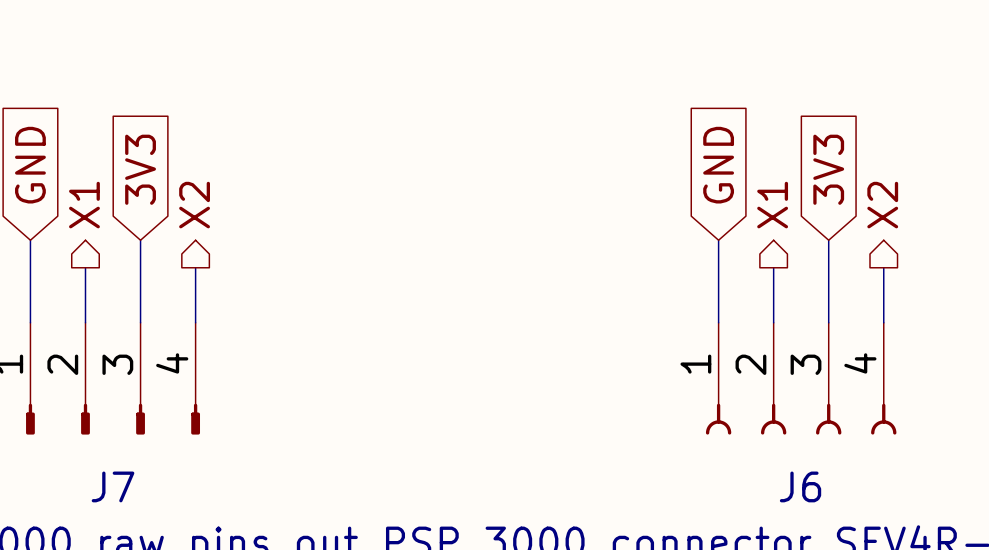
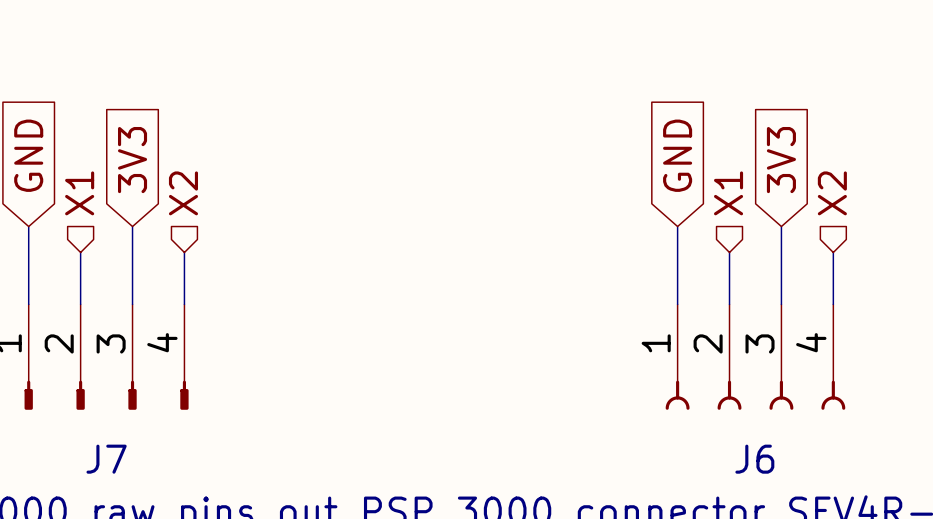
hierarchical label shape: output (84, 205) -> input (79, 193)
hierarchical label shape: output (194, 205) -> input (183, 193)
hierarchical label shape: output (772, 205) -> input (728, 193)
hierarchical label shape: output (882, 205) -> input (832, 193)

